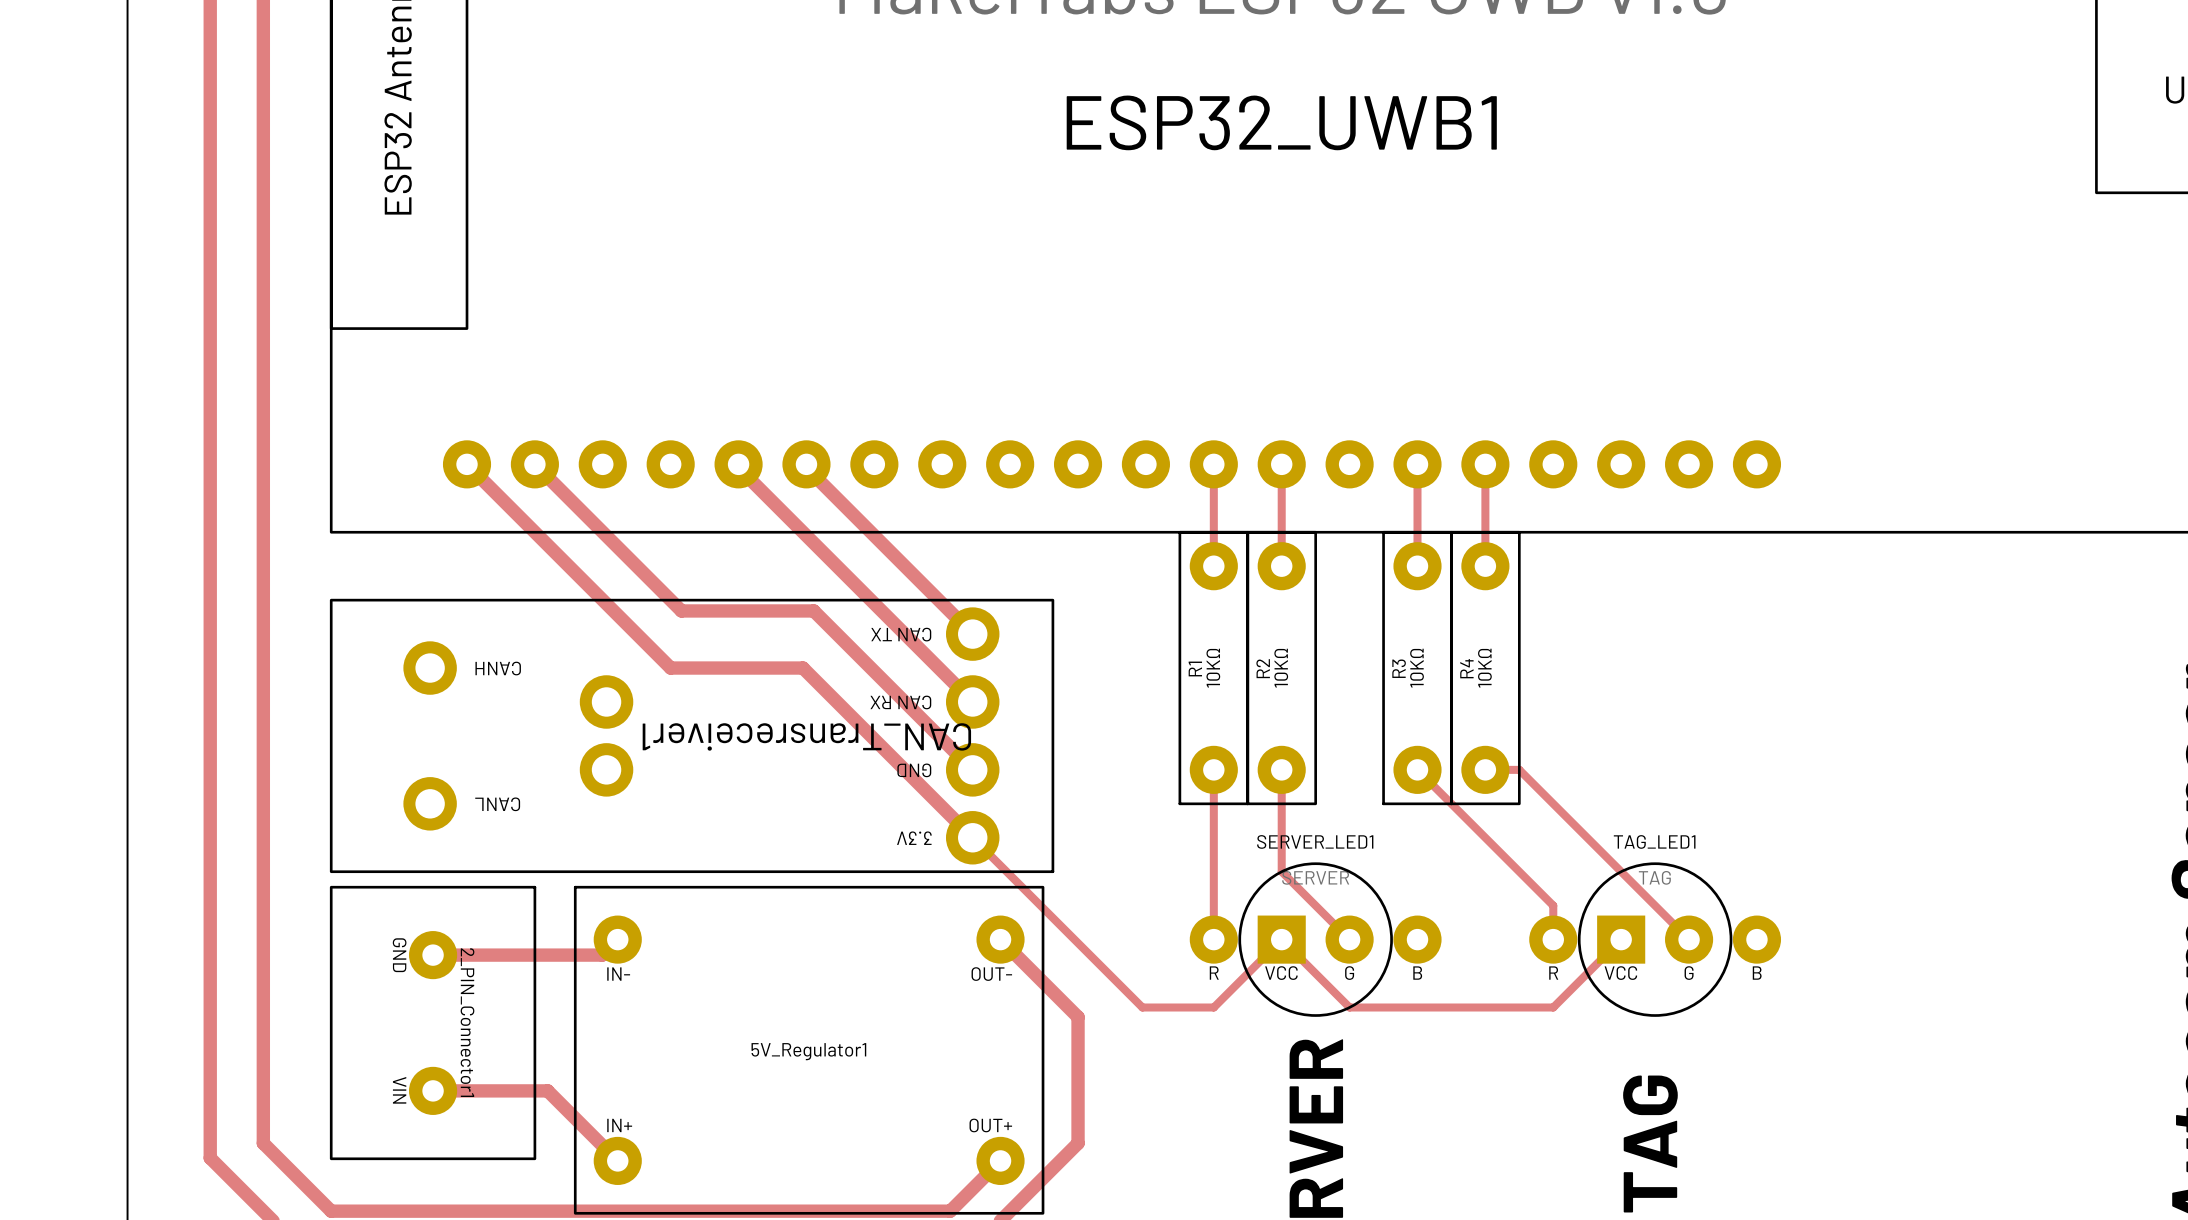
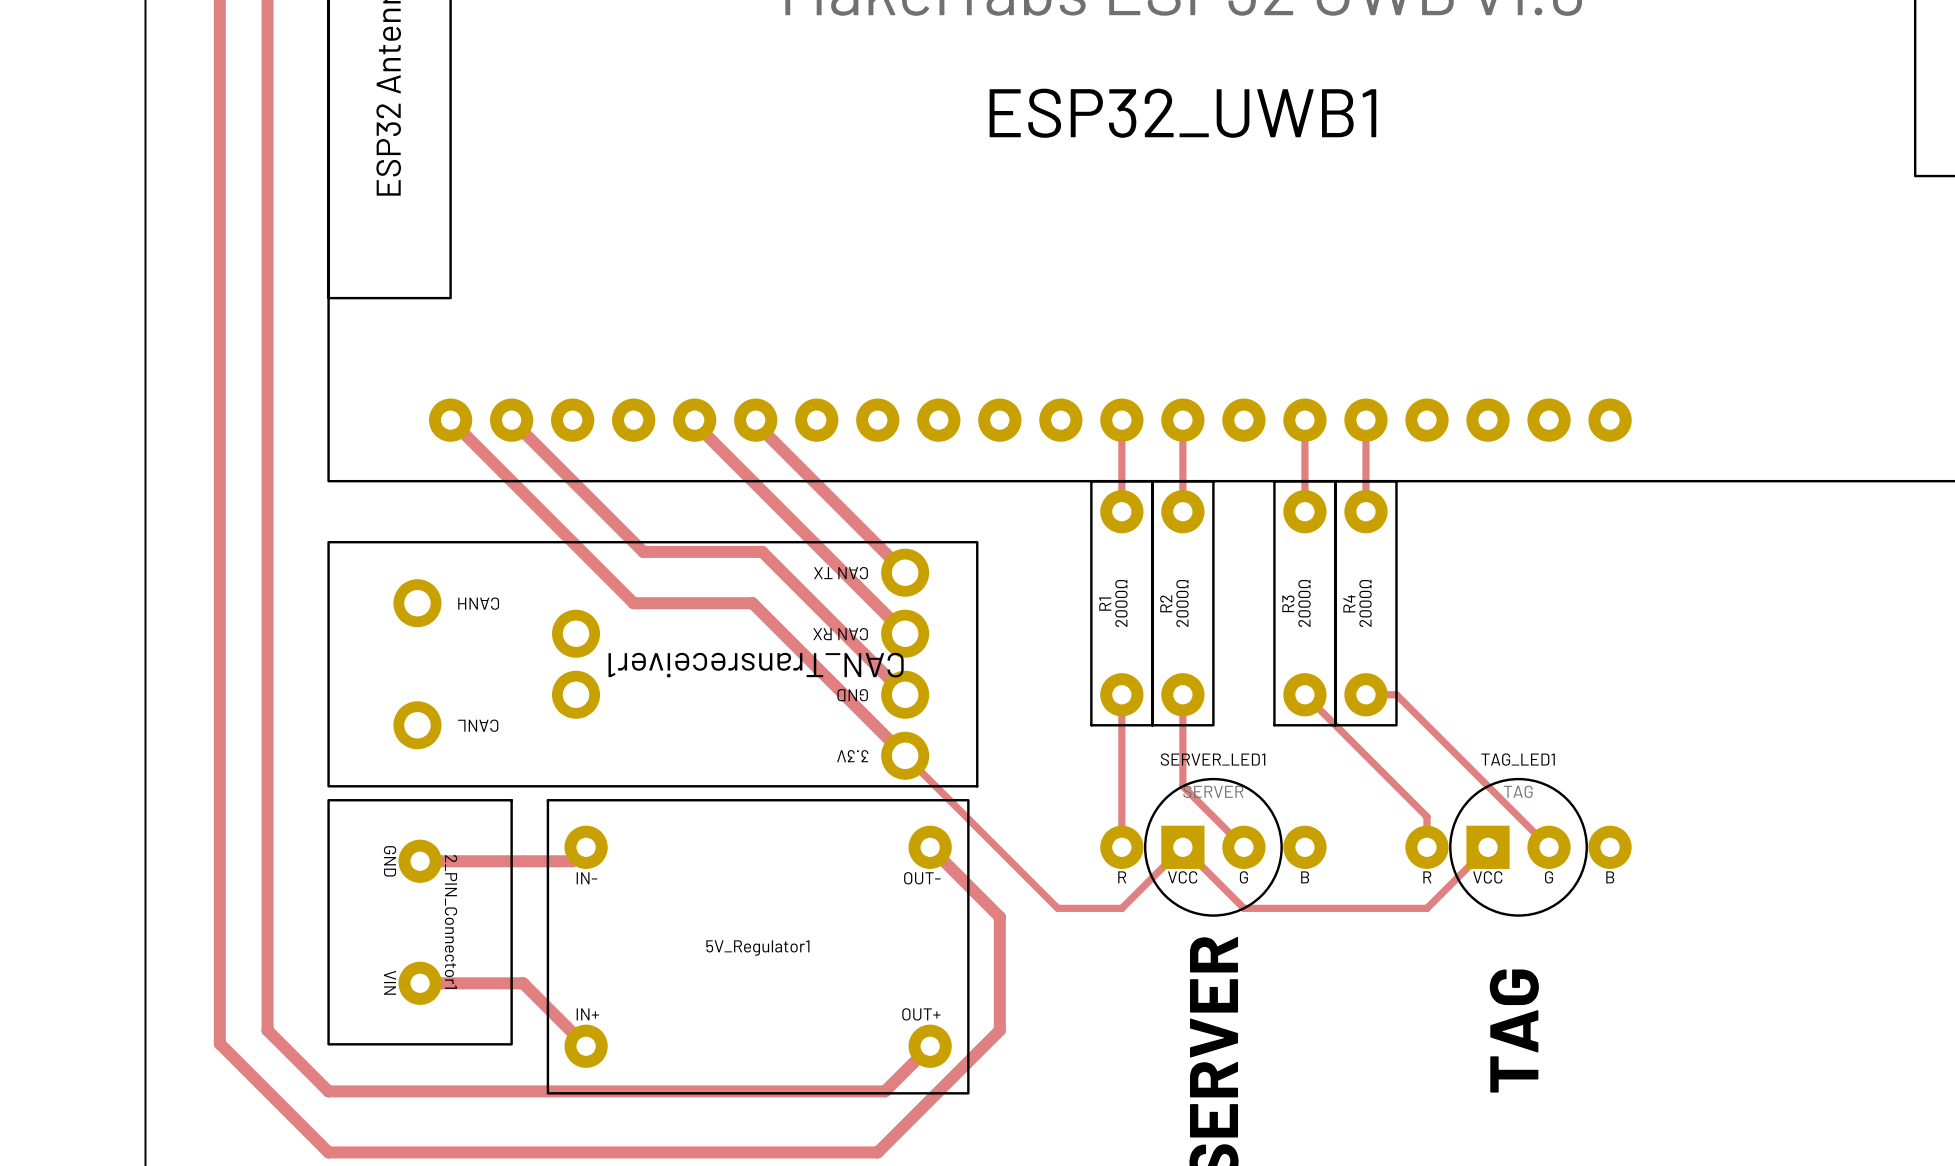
R1 value: 10KΩ (1213, 668) -> 2000Ω (1121, 603)
R2 value: 10KΩ (1281, 668) -> 2000Ω (1182, 603)
R3 value: 10KΩ (1417, 668) -> 2000Ω (1304, 603)
R4 value: 10KΩ (1484, 668) -> 2000Ω (1365, 603)

